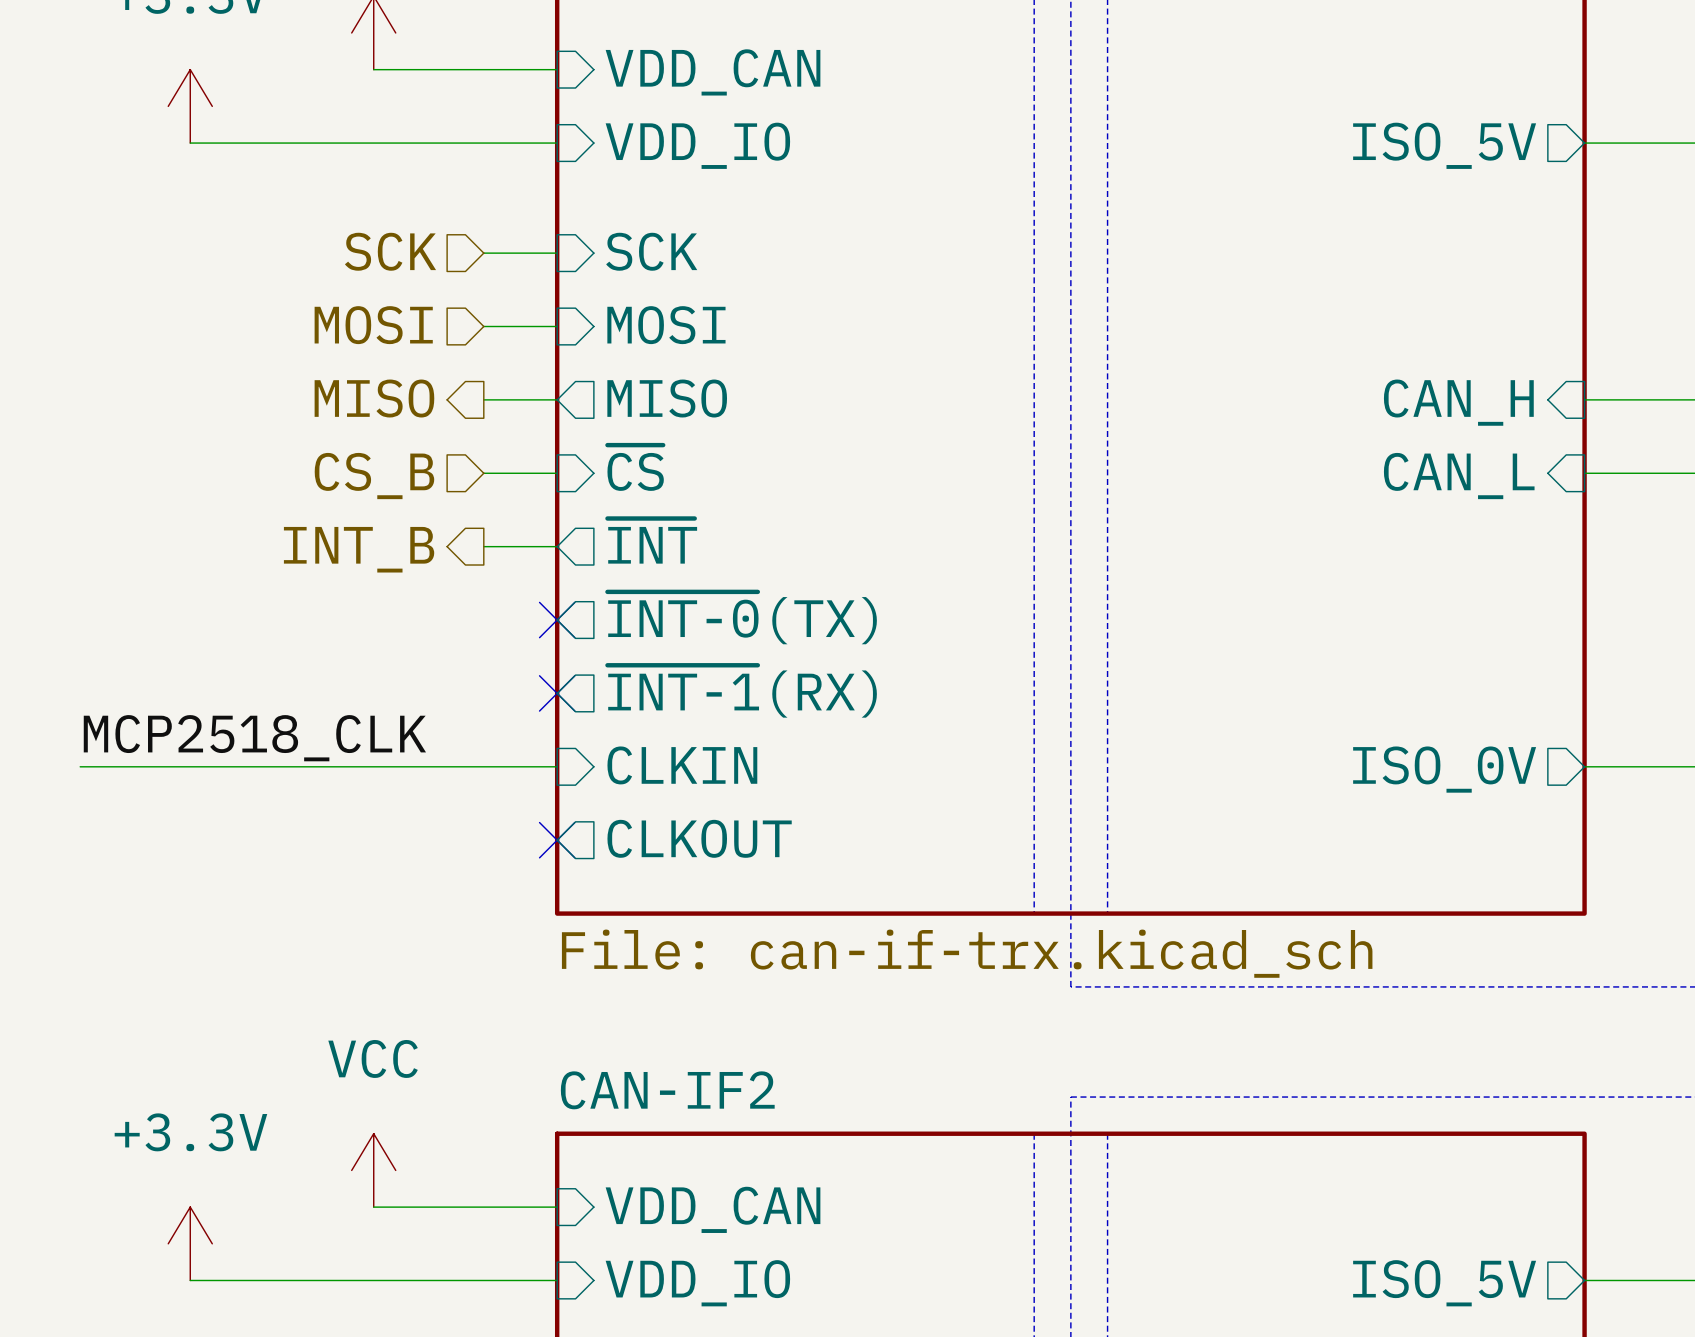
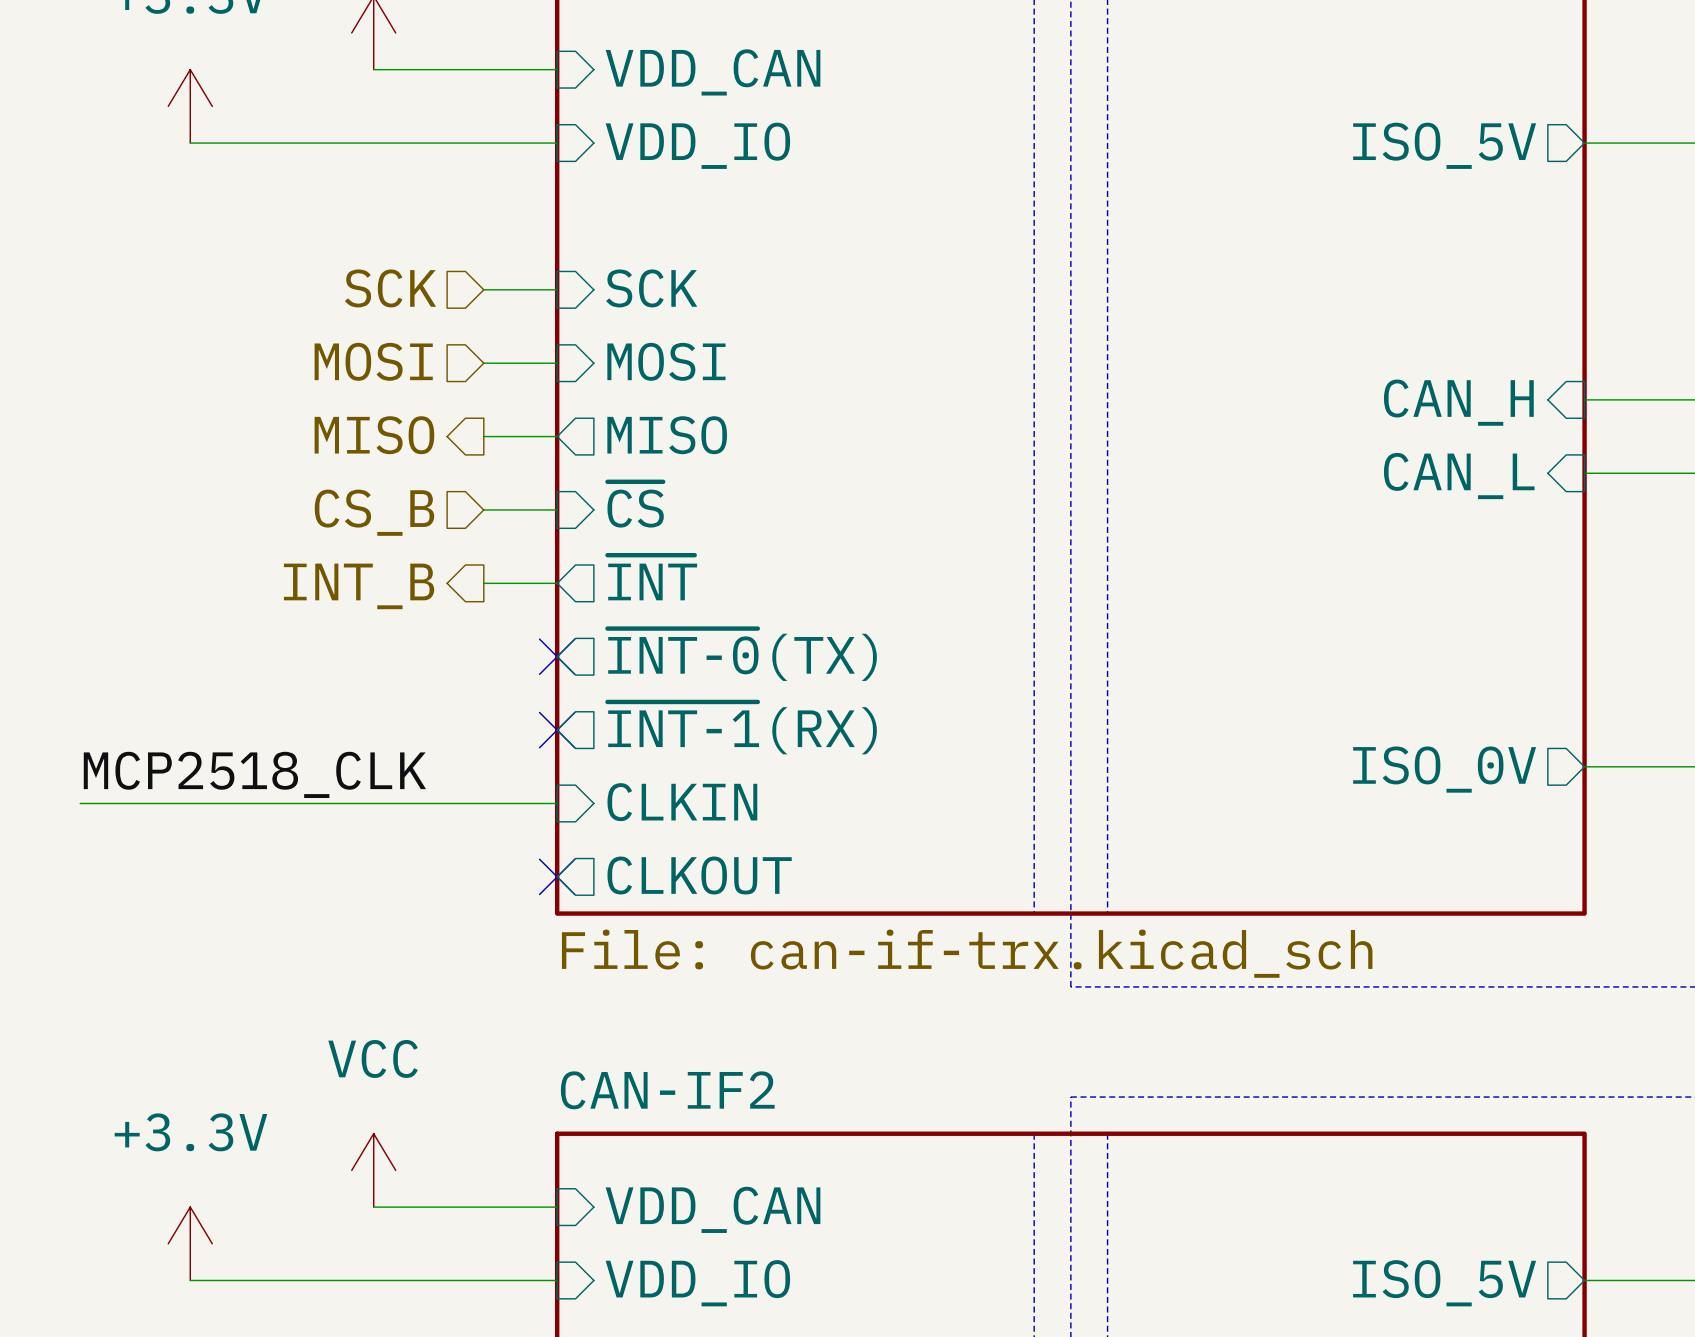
hierarchical label position: SCK (390, 251) -> SCK (390, 288)
sheet pin position: SCK (651, 251) -> SCK (651, 288)
wire: (483, 253) (557, 253) -> (483, 289) (557, 289)
hierarchical label position: MOSI (373, 325) -> MOSI (373, 361)
sheet pin position: MOSI (666, 325) -> MOSI (666, 361)
wire: (483, 326) (557, 326) -> (483, 363) (557, 363)
hierarchical label position: MISO (374, 398) -> MISO (374, 435)
sheet pin position: MISO (667, 398) -> MISO (667, 435)
wire: (483, 399) (557, 399) -> (483, 436) (557, 436)
sheet pin position: ~{CS} (635, 467) -> ~{CS} (635, 504)
wire: (483, 473) (557, 473) -> (483, 509) (557, 509)
hierarchical label position: CS_B (374, 476) -> CS_B (374, 512)
sheet pin position: ~{INT} (652, 541) -> ~{INT} (652, 577)
wire: (483, 546) (557, 546) -> (483, 583) (557, 583)
hierarchical label position: INT_B (359, 549) -> INT_B (359, 586)
sheet pin position: ~{INT-0}(TX) (742, 618) -> ~{INT-0}(TX) (742, 654)
no-connect mark: (557, 620) -> none
no-connect mark: none -> (557, 656)
sheet pin position: ~{INT-1}(RX) (742, 691) -> ~{INT-1}(RX) (742, 728)
no-connect mark: (557, 693) -> none
no-connect mark: none -> (557, 730)
label position: MCP2518_CLK (254, 738) -> MCP2518_CLK (254, 774)
sheet pin position: CLKIN (682, 765) -> CLKIN (682, 802)
wire: (80, 766) (557, 766) -> (80, 803) (557, 803)
sheet pin position: CLKOUT (699, 838) -> CLKOUT (699, 875)
no-connect mark position: (557, 840) -> (557, 876)

